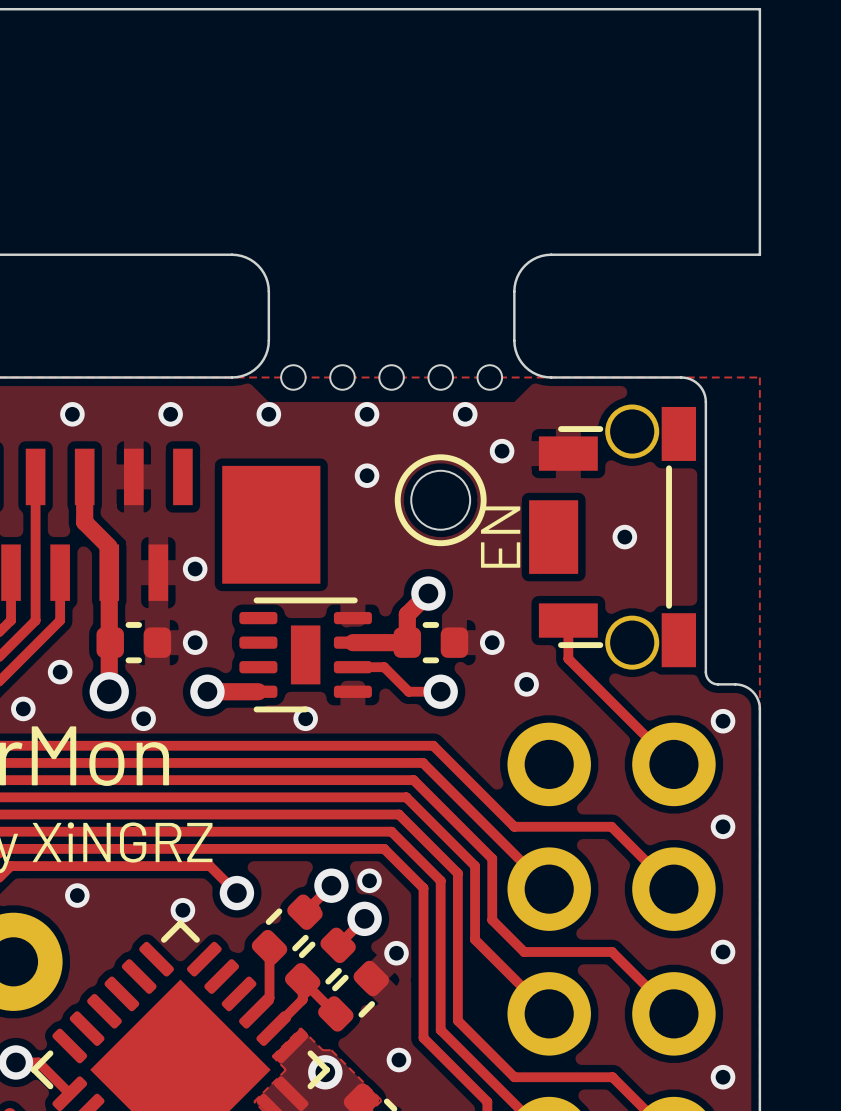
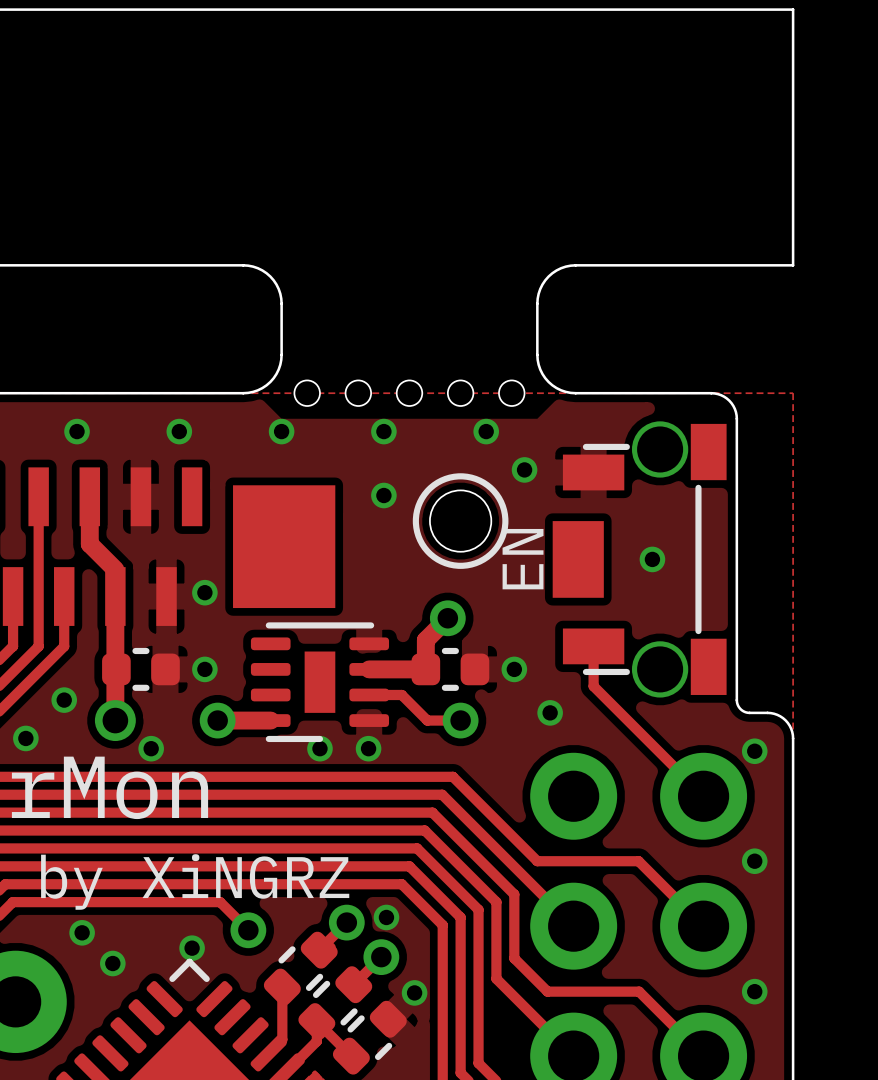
via: none -> (368, 748)
via: none -> (112, 963)

